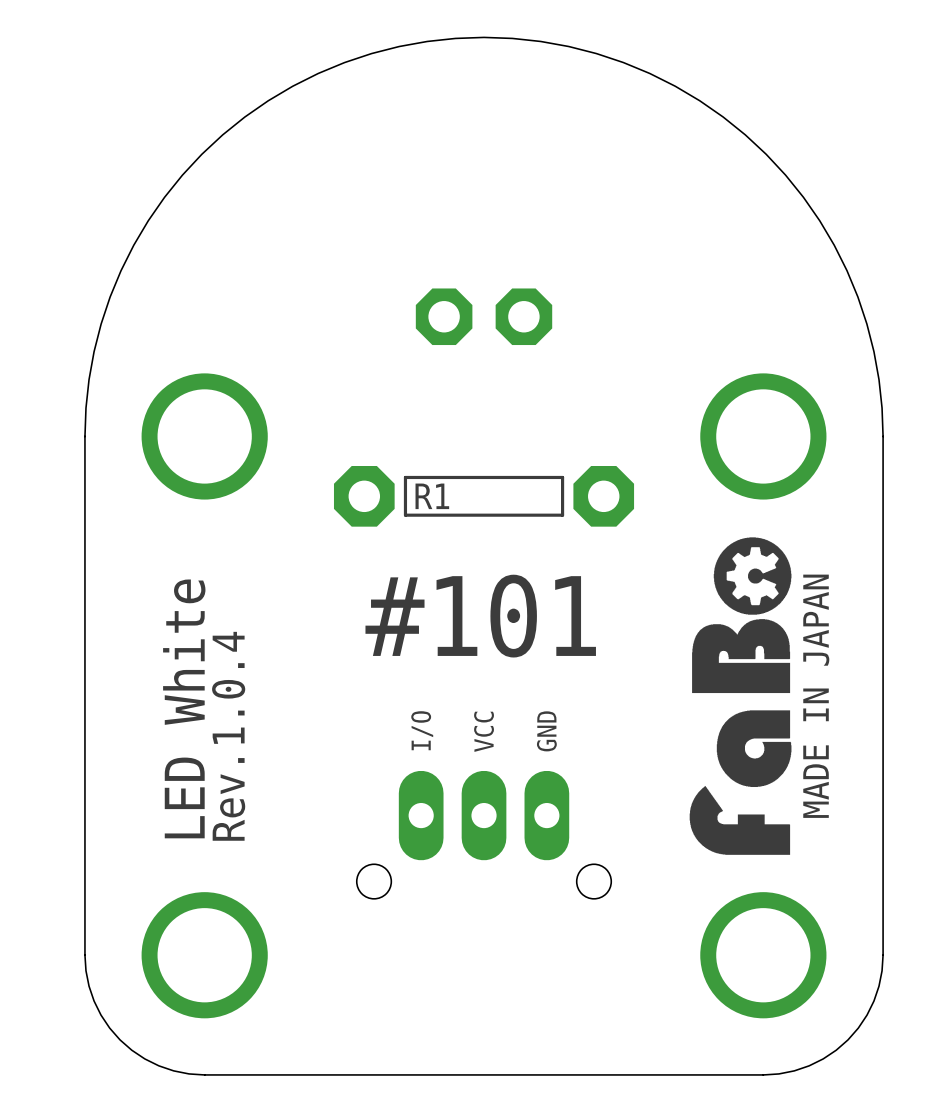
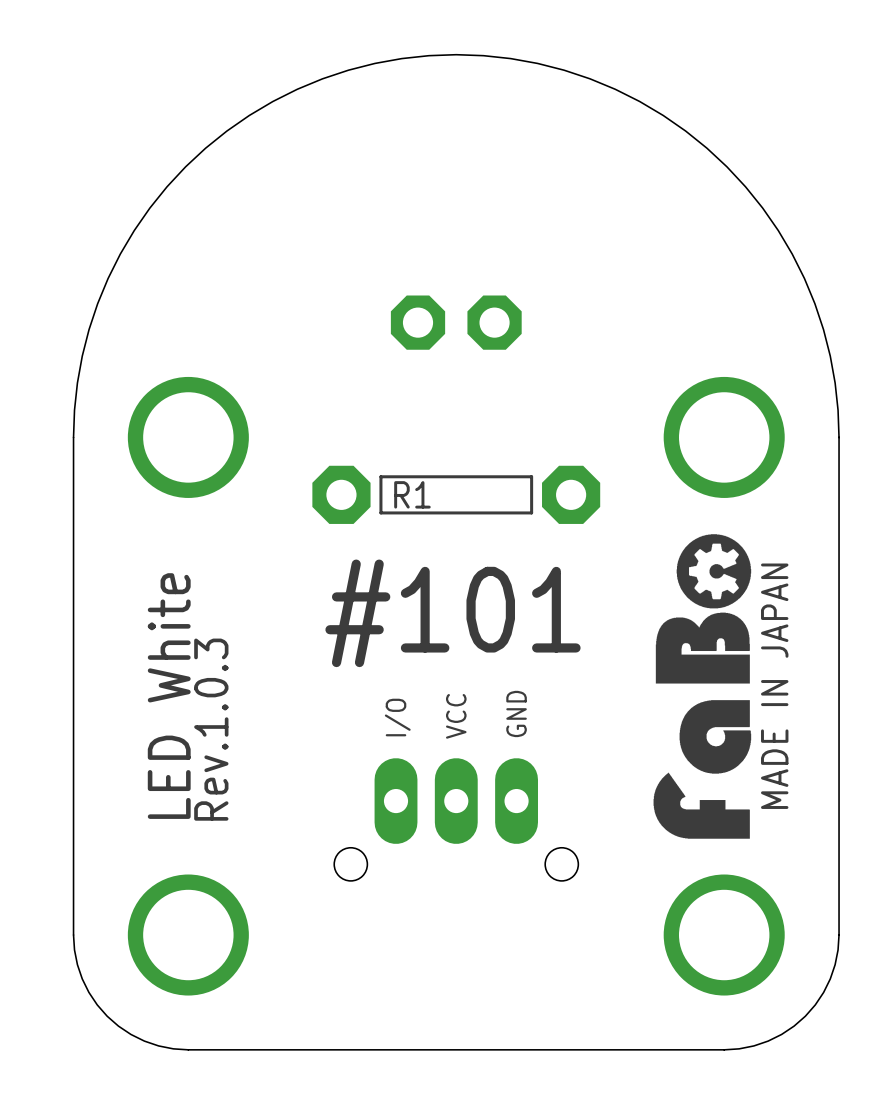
text: Rev.1.0.4 (228, 736) -> Rev.1.0.3 (211, 729)

